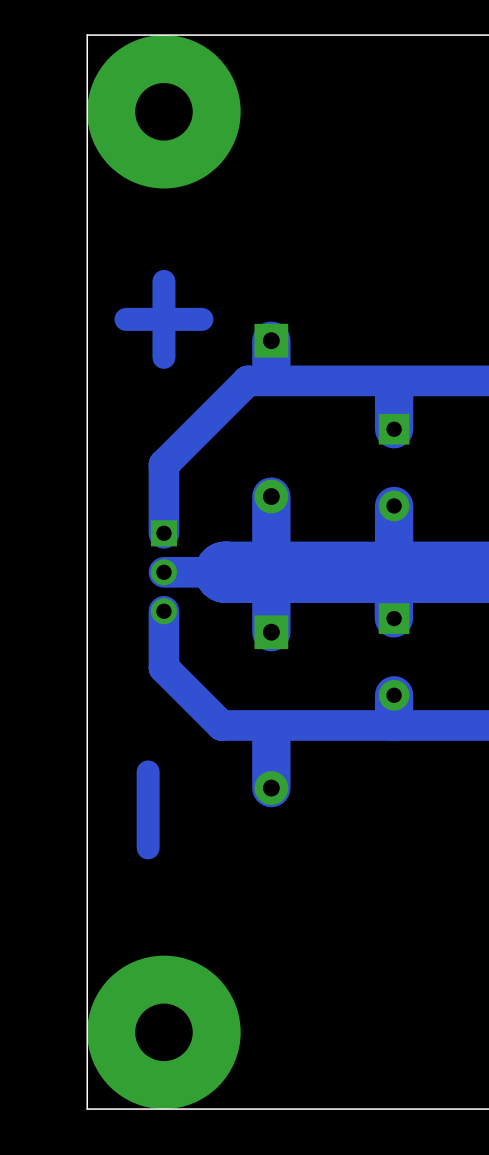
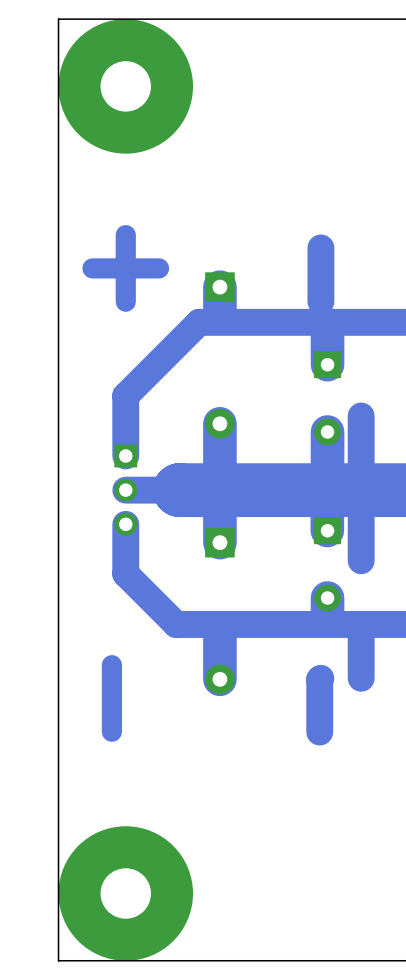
track: none -> (320, 247) (320, 301)
track: none -> (361, 415) (361, 560)
track: none -> (361, 628) (361, 678)
track: none -> (320, 678) (319, 732)

